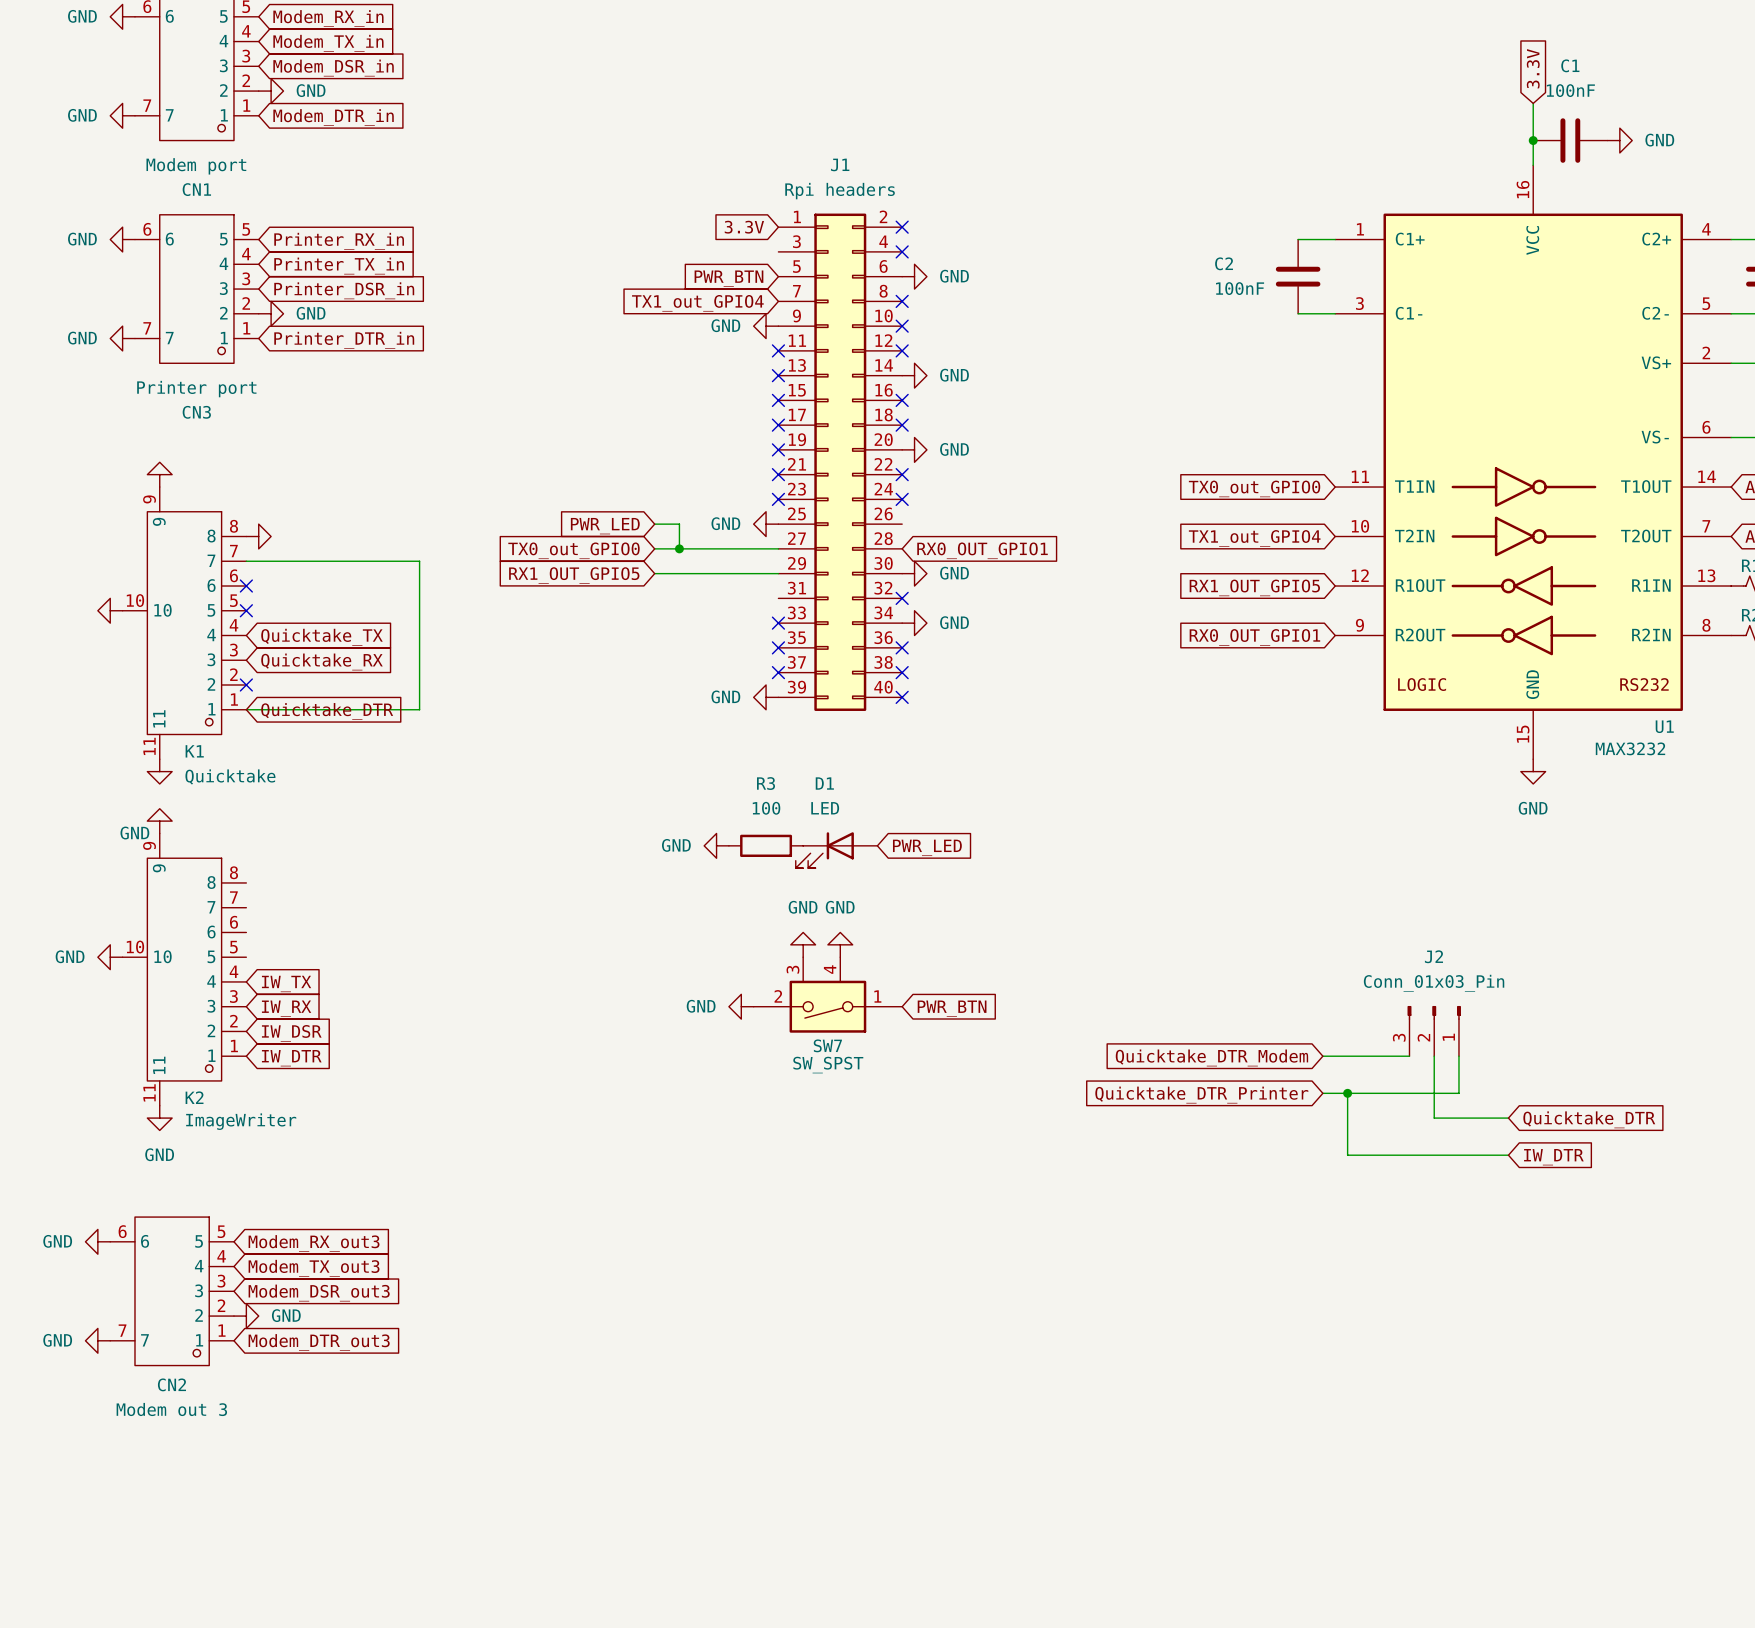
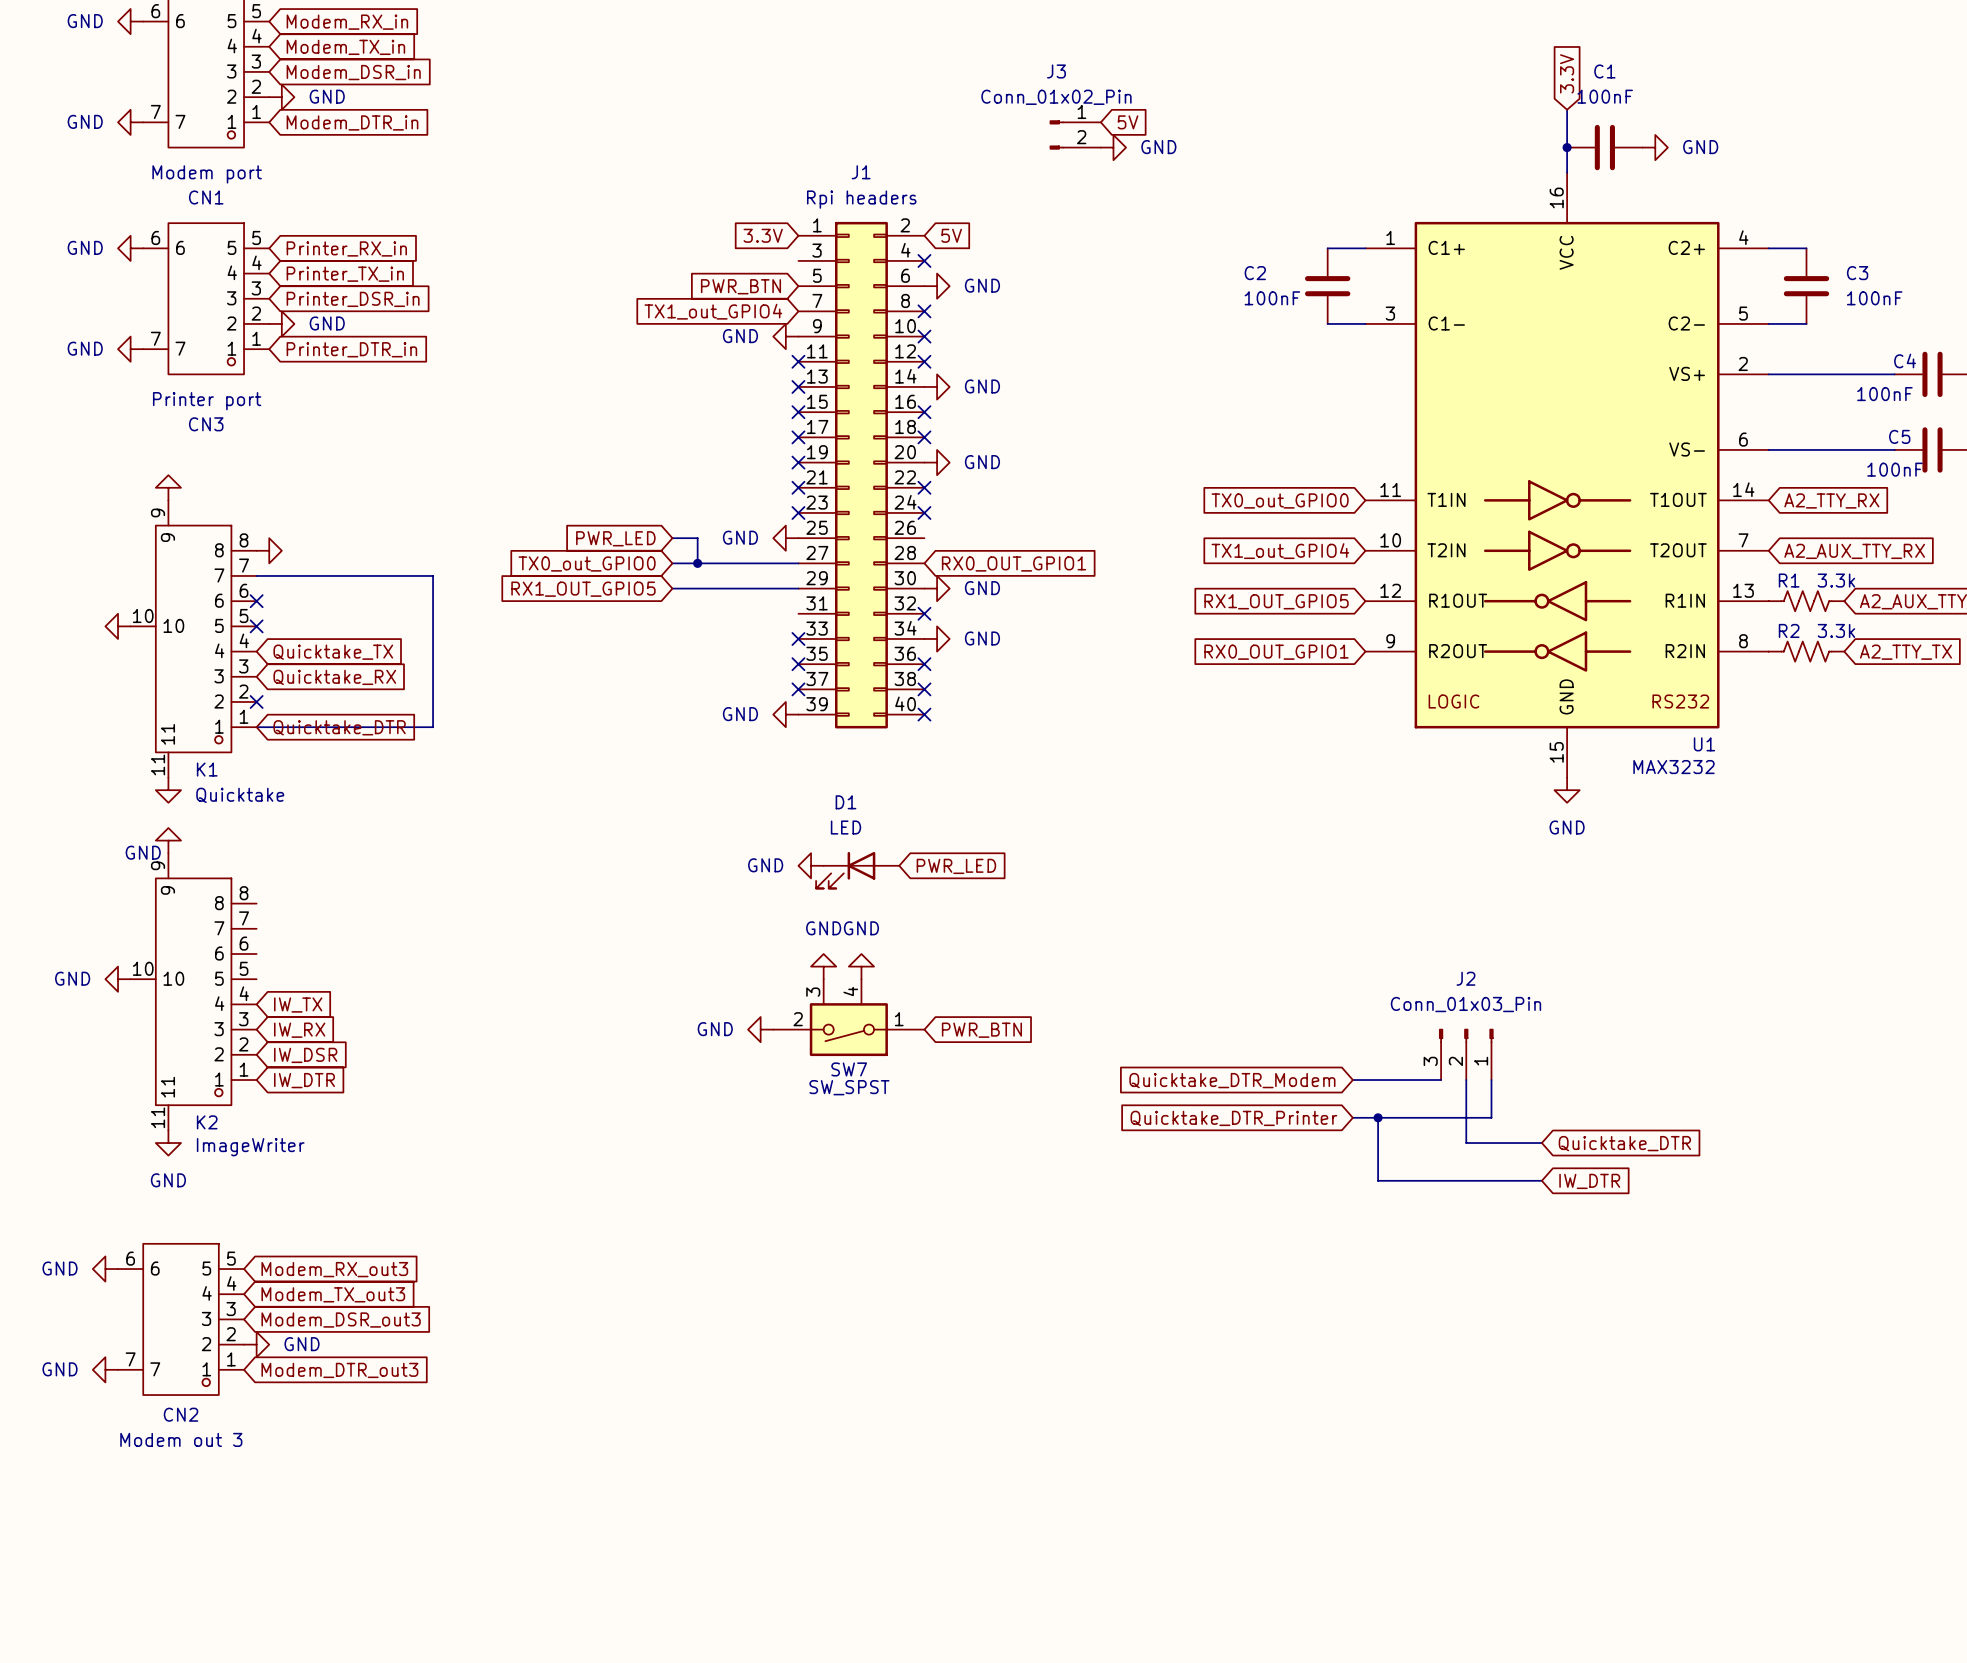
global label: none -> 5V (1128, 122)
J3: none -> Conn_01x02_Pin (1075, 134)
power symbol: none -> GND (1113, 147)
no-connect mark: (902, 227) -> none
global label: none -> 5V (951, 235)
power symbol position: GND (716, 845) -> GND (811, 865)
R3: 100 (766, 845) -> none

